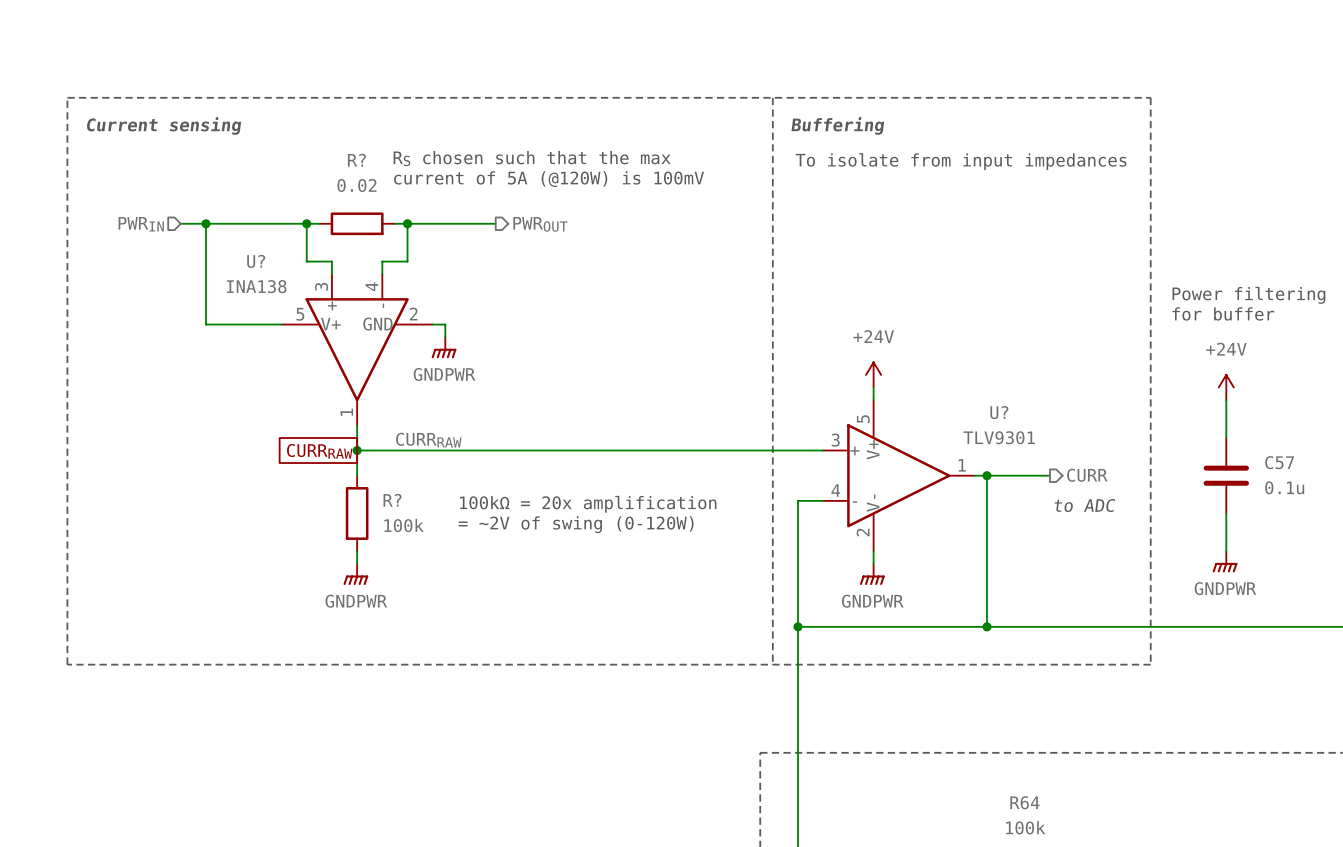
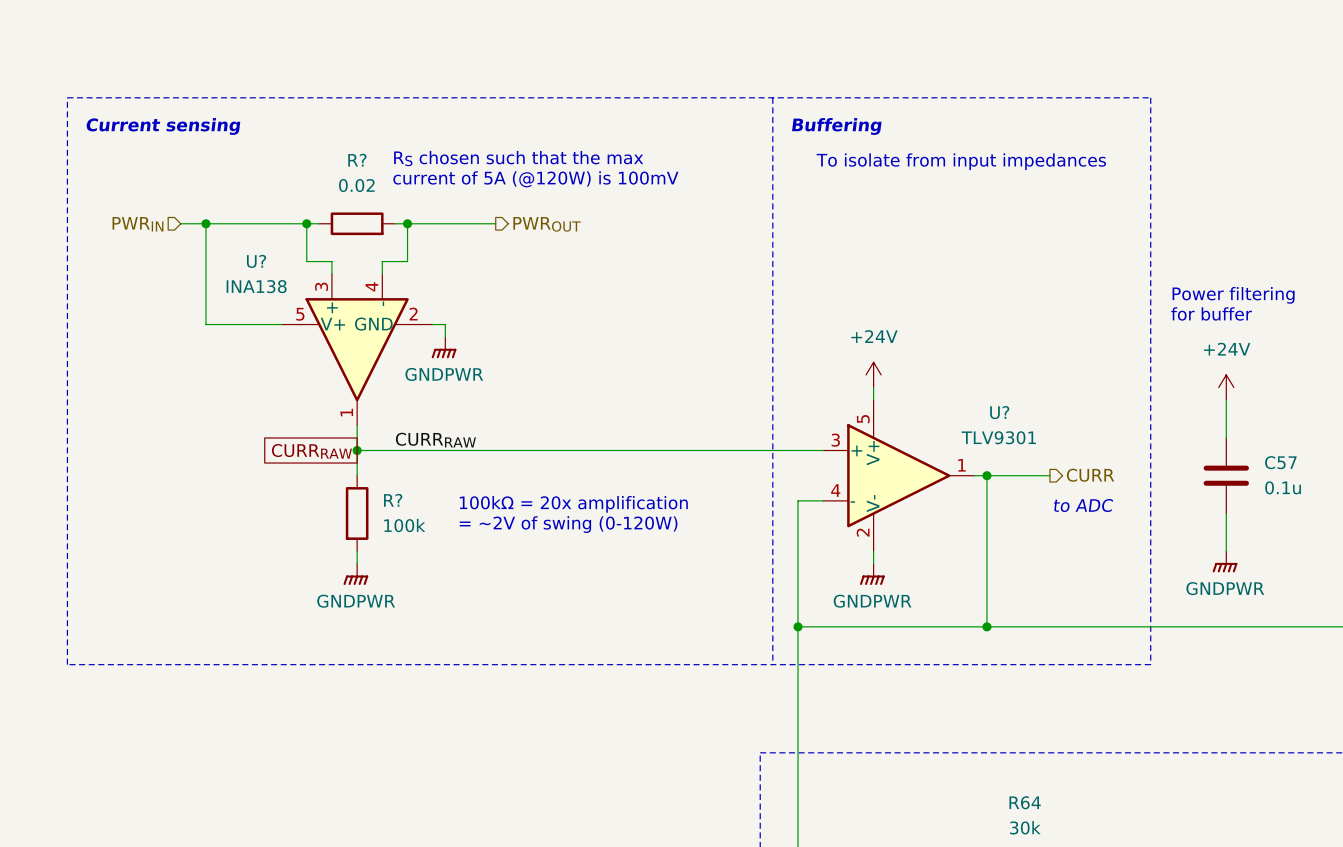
R64 value: 100k (1025, 827) -> 30k (1025, 827)

